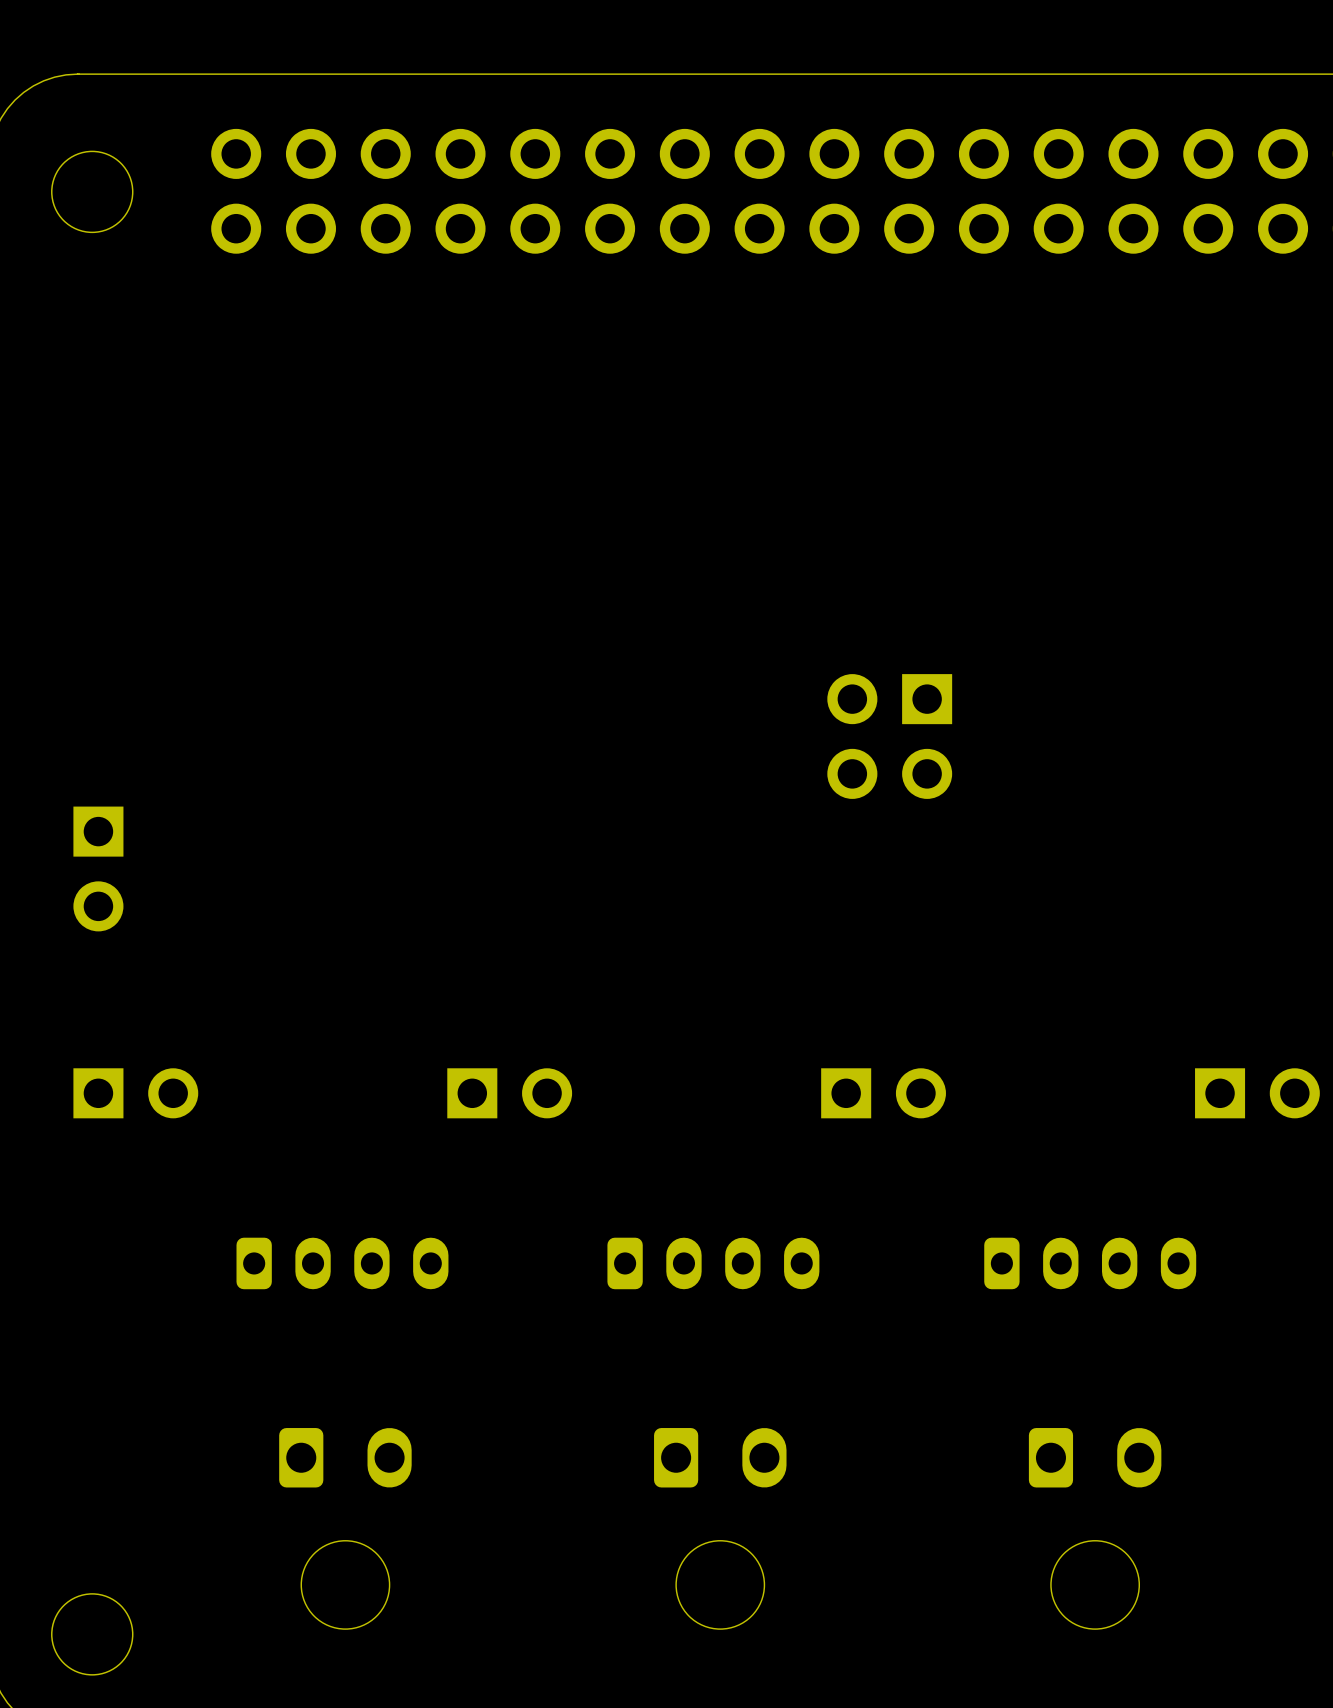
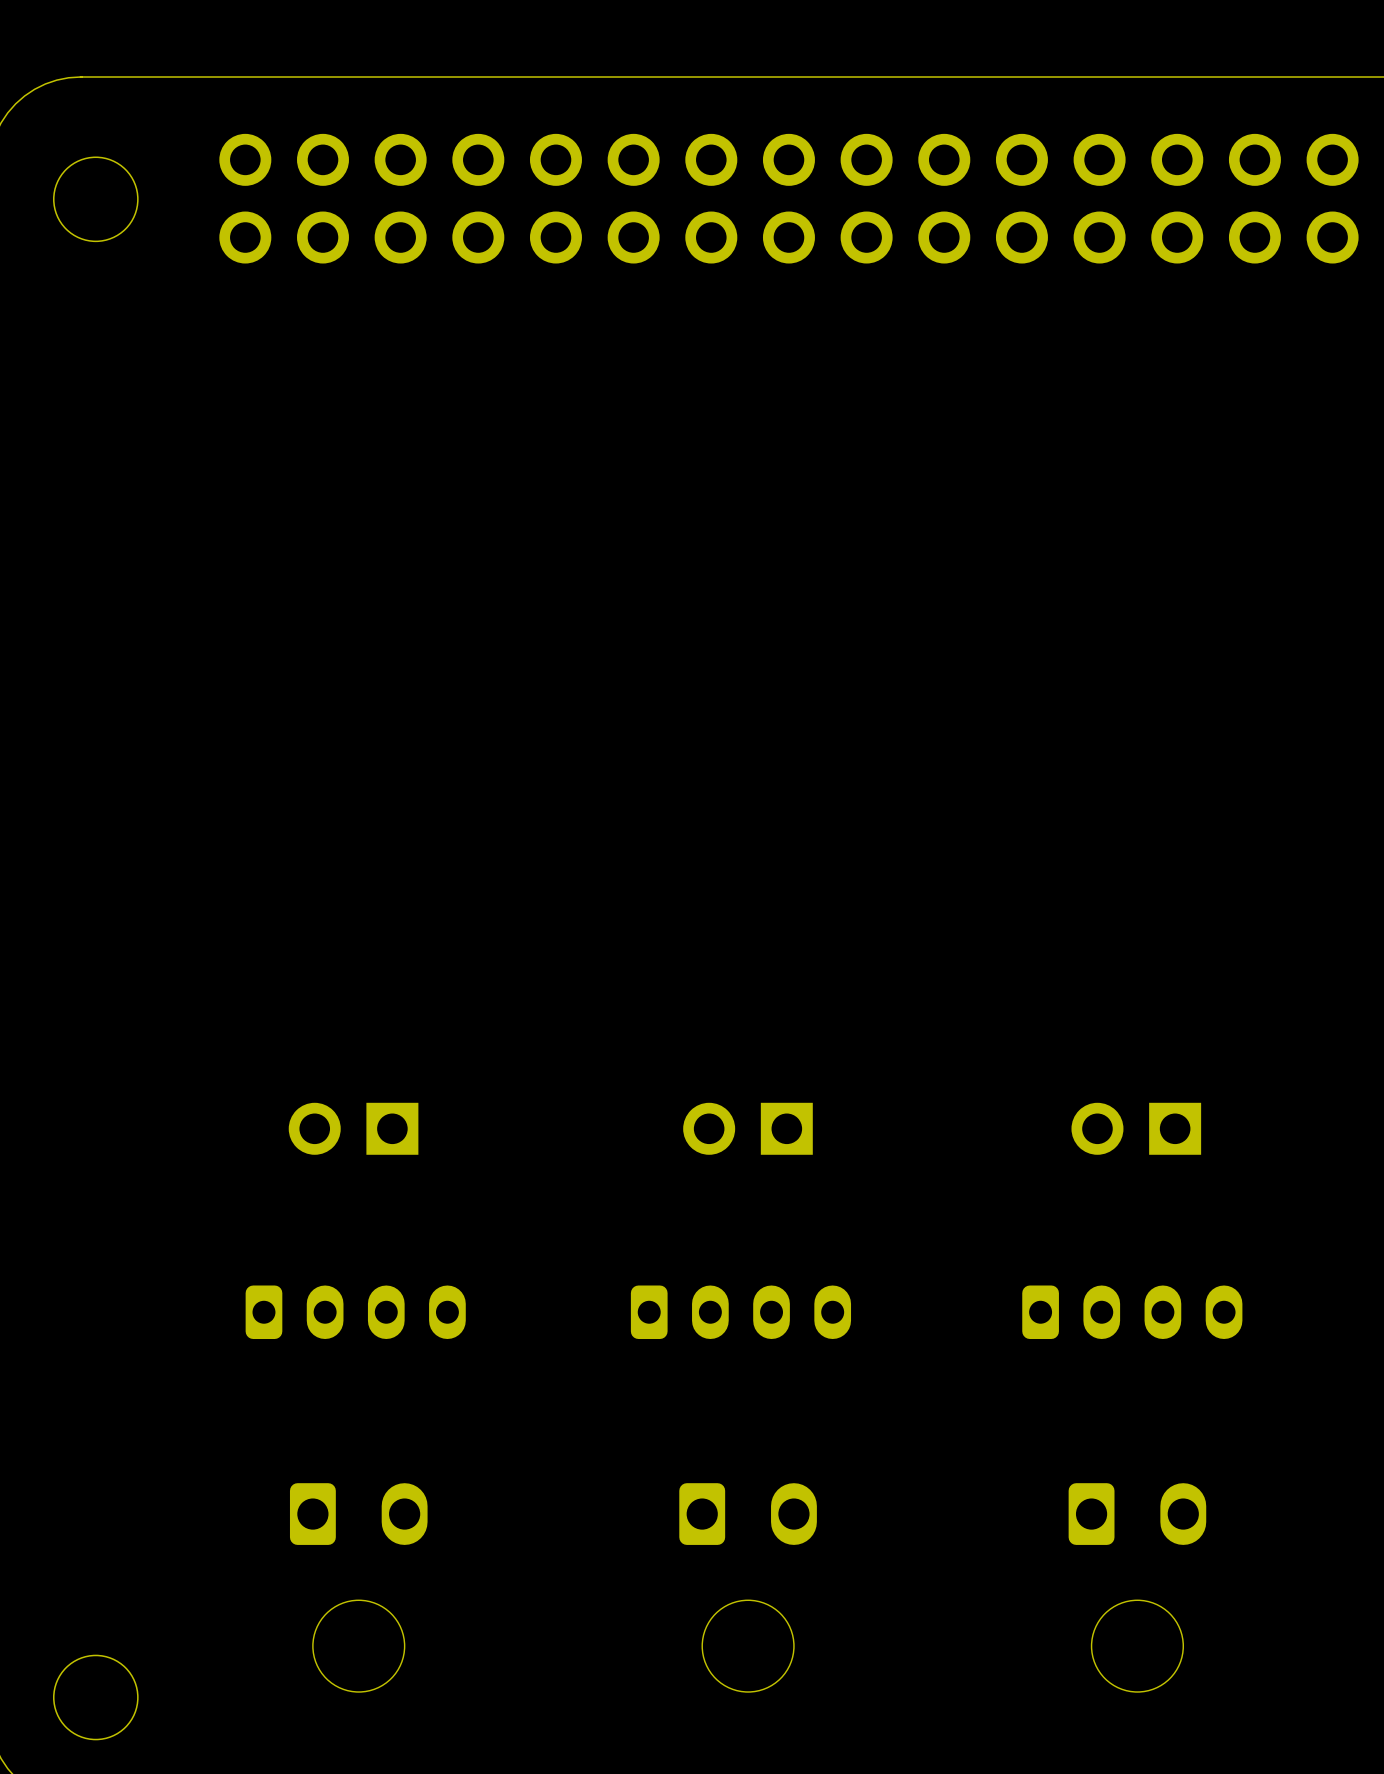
part: (889, 736) -> none
part: (98, 868) -> none
part: none -> (353, 1128)
part: none -> (747, 1128)
part: none -> (1136, 1128)
part: (135, 1093) -> none
part: (509, 1093) -> none
part: (883, 1093) -> none
part: (1257, 1093) -> none

